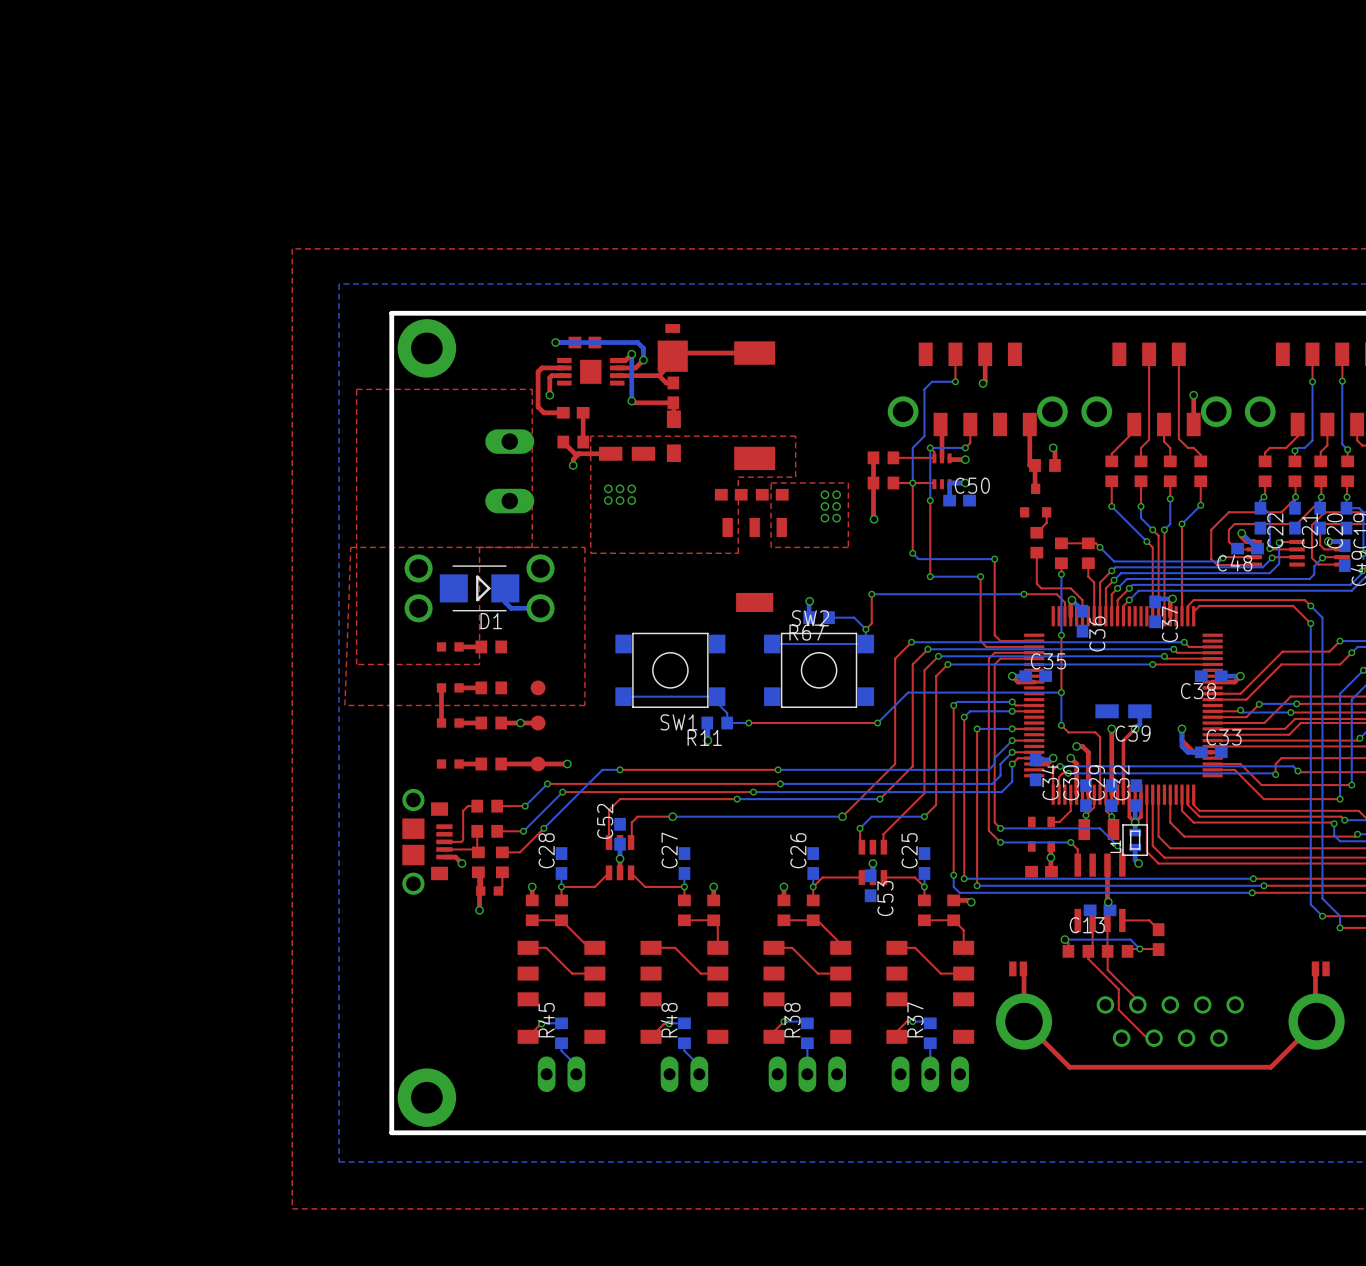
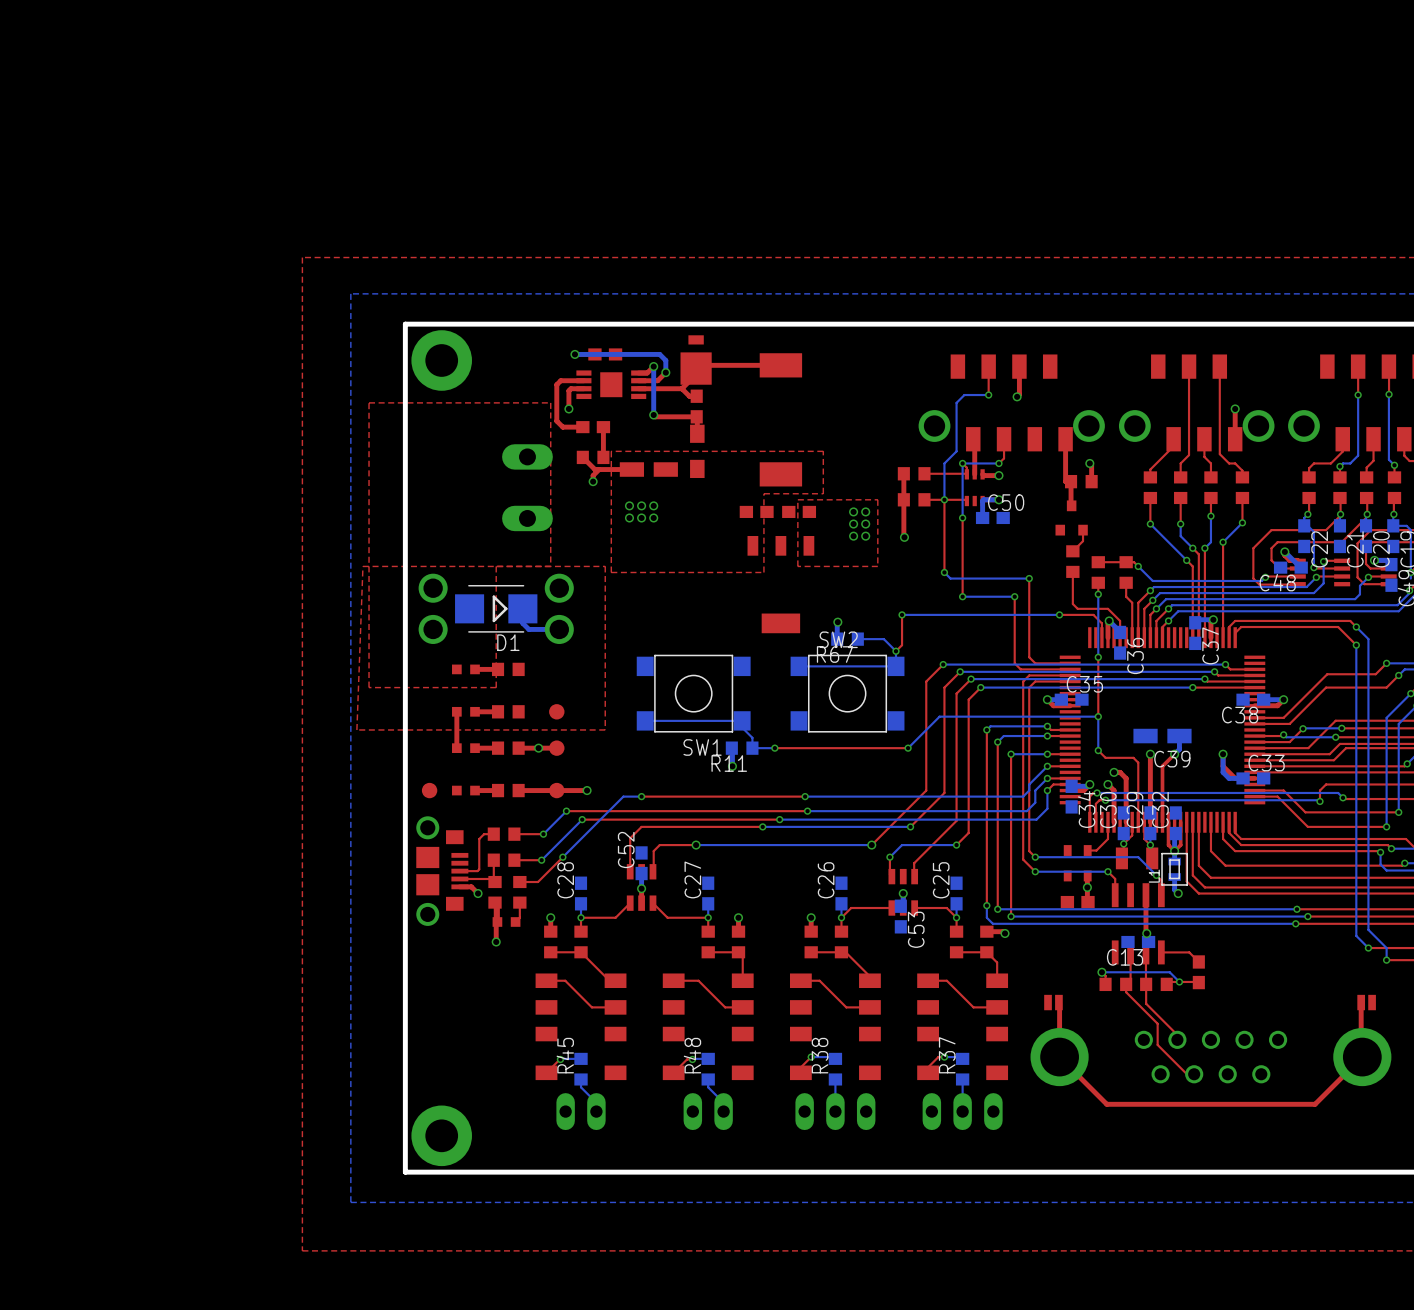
part: none -> (429, 790)

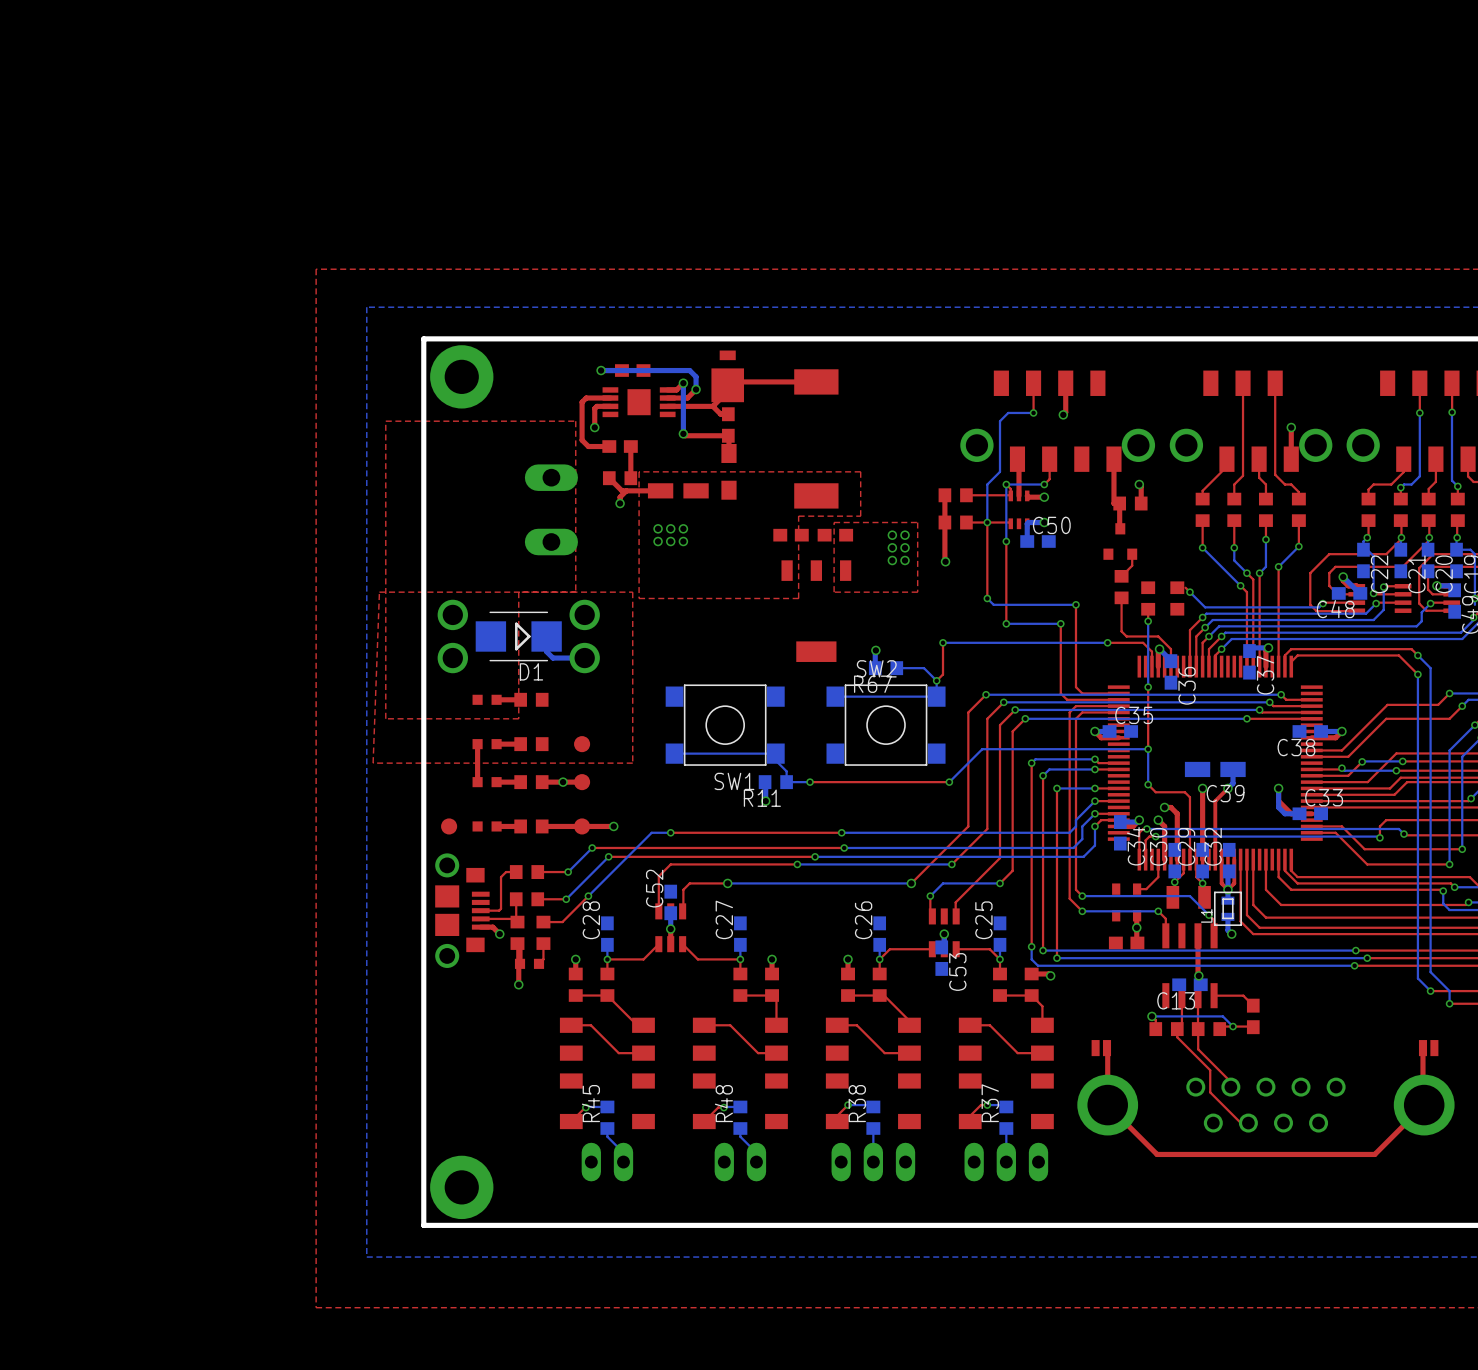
top track: (1134, 562) (1098, 562) -> none
top track: (1126, 582) (1126, 596) (1132, 602) (1132, 637) -> none

